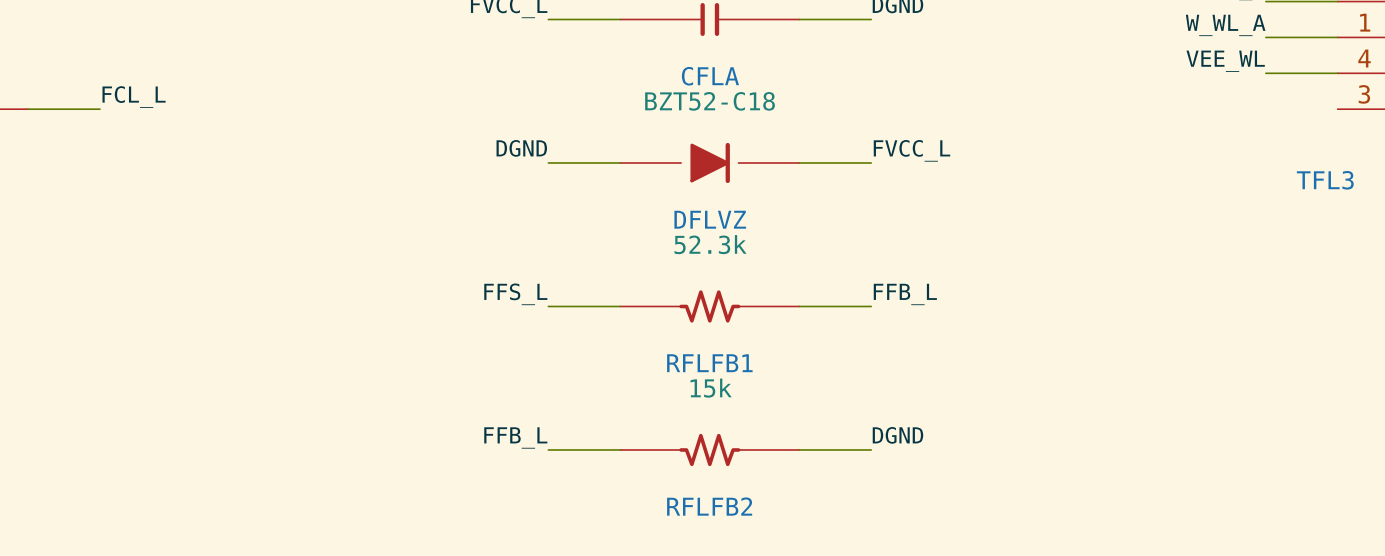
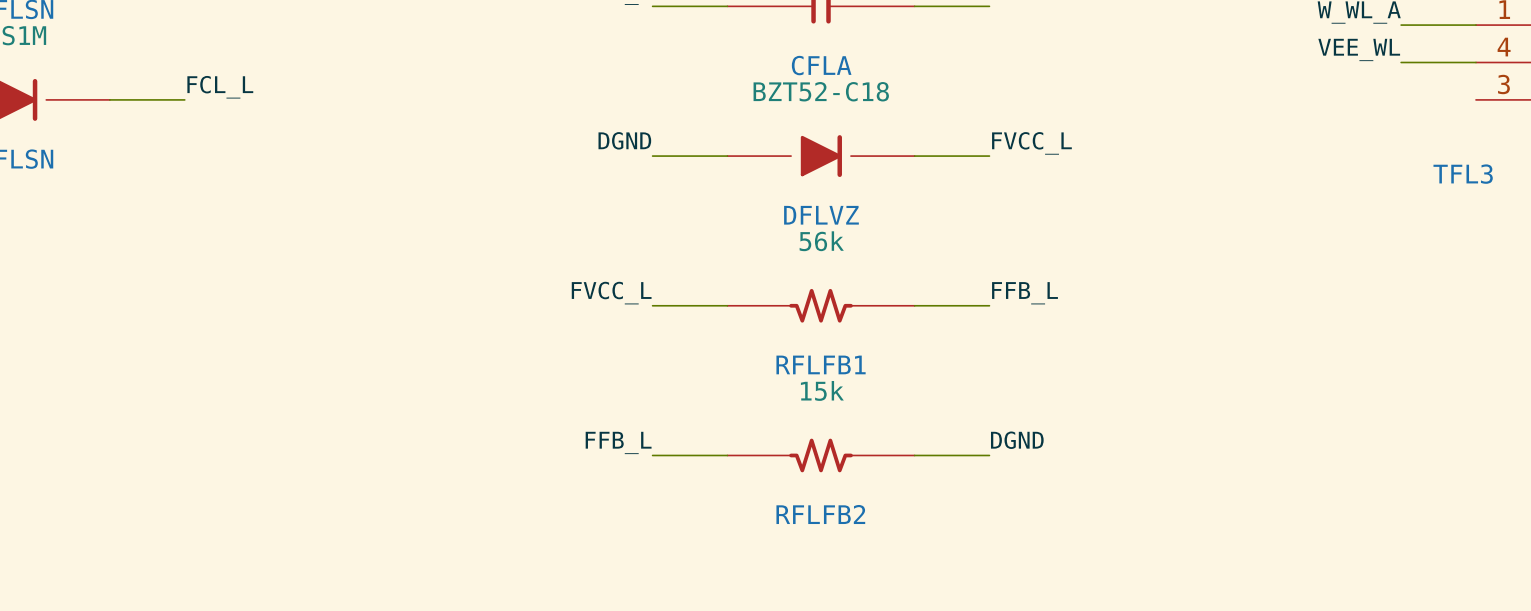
RFLFB1 value: 52.3k (710, 244) -> 56k (821, 241)
label: FFS_L (515, 294) -> FVCC_L (611, 293)

